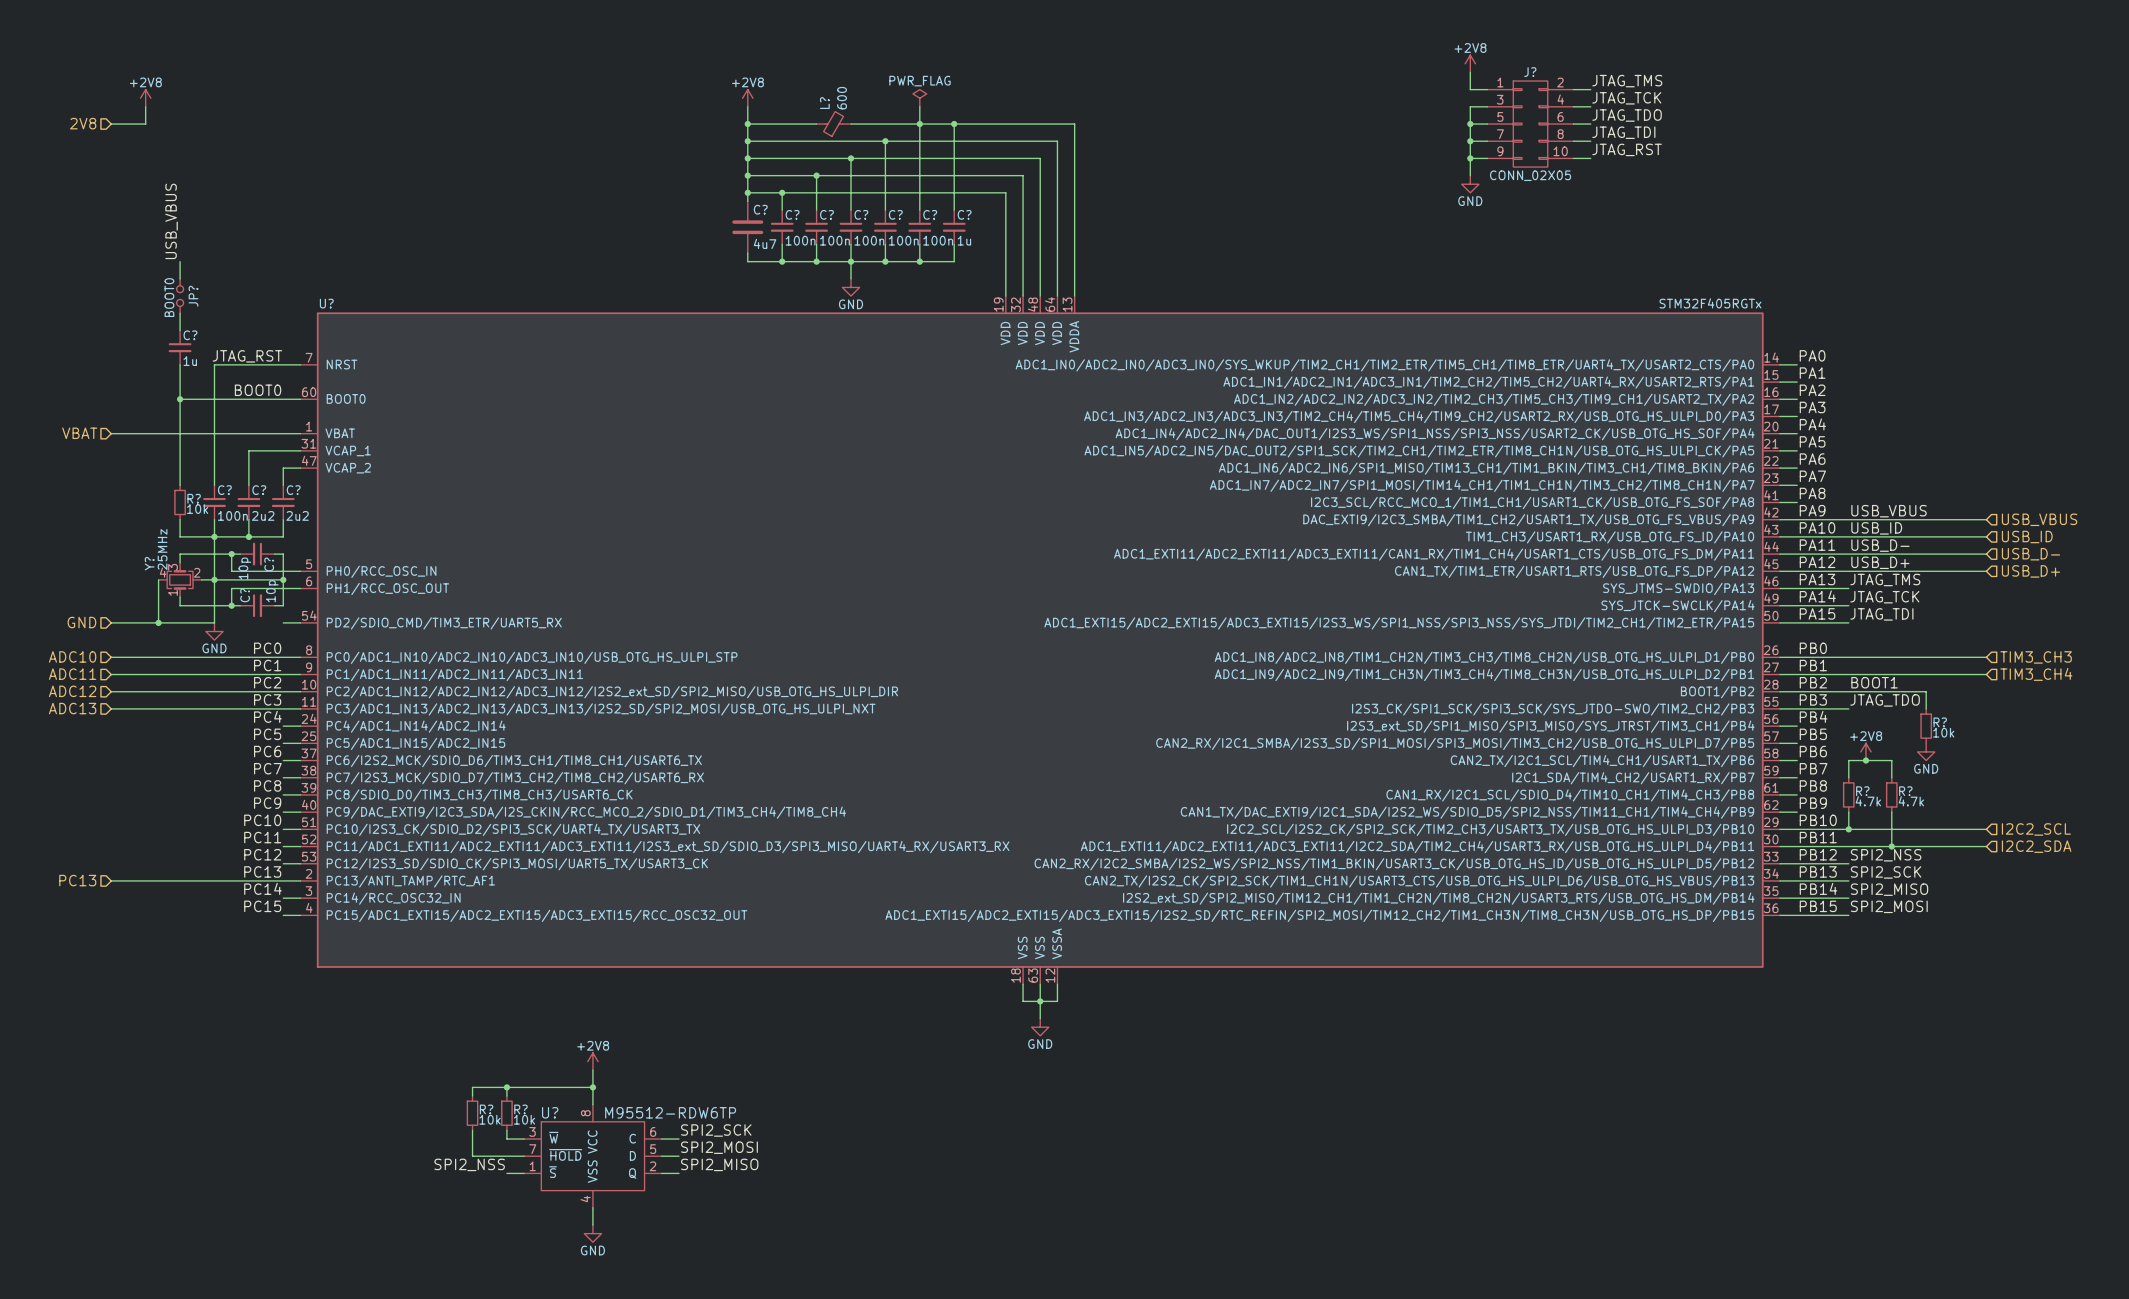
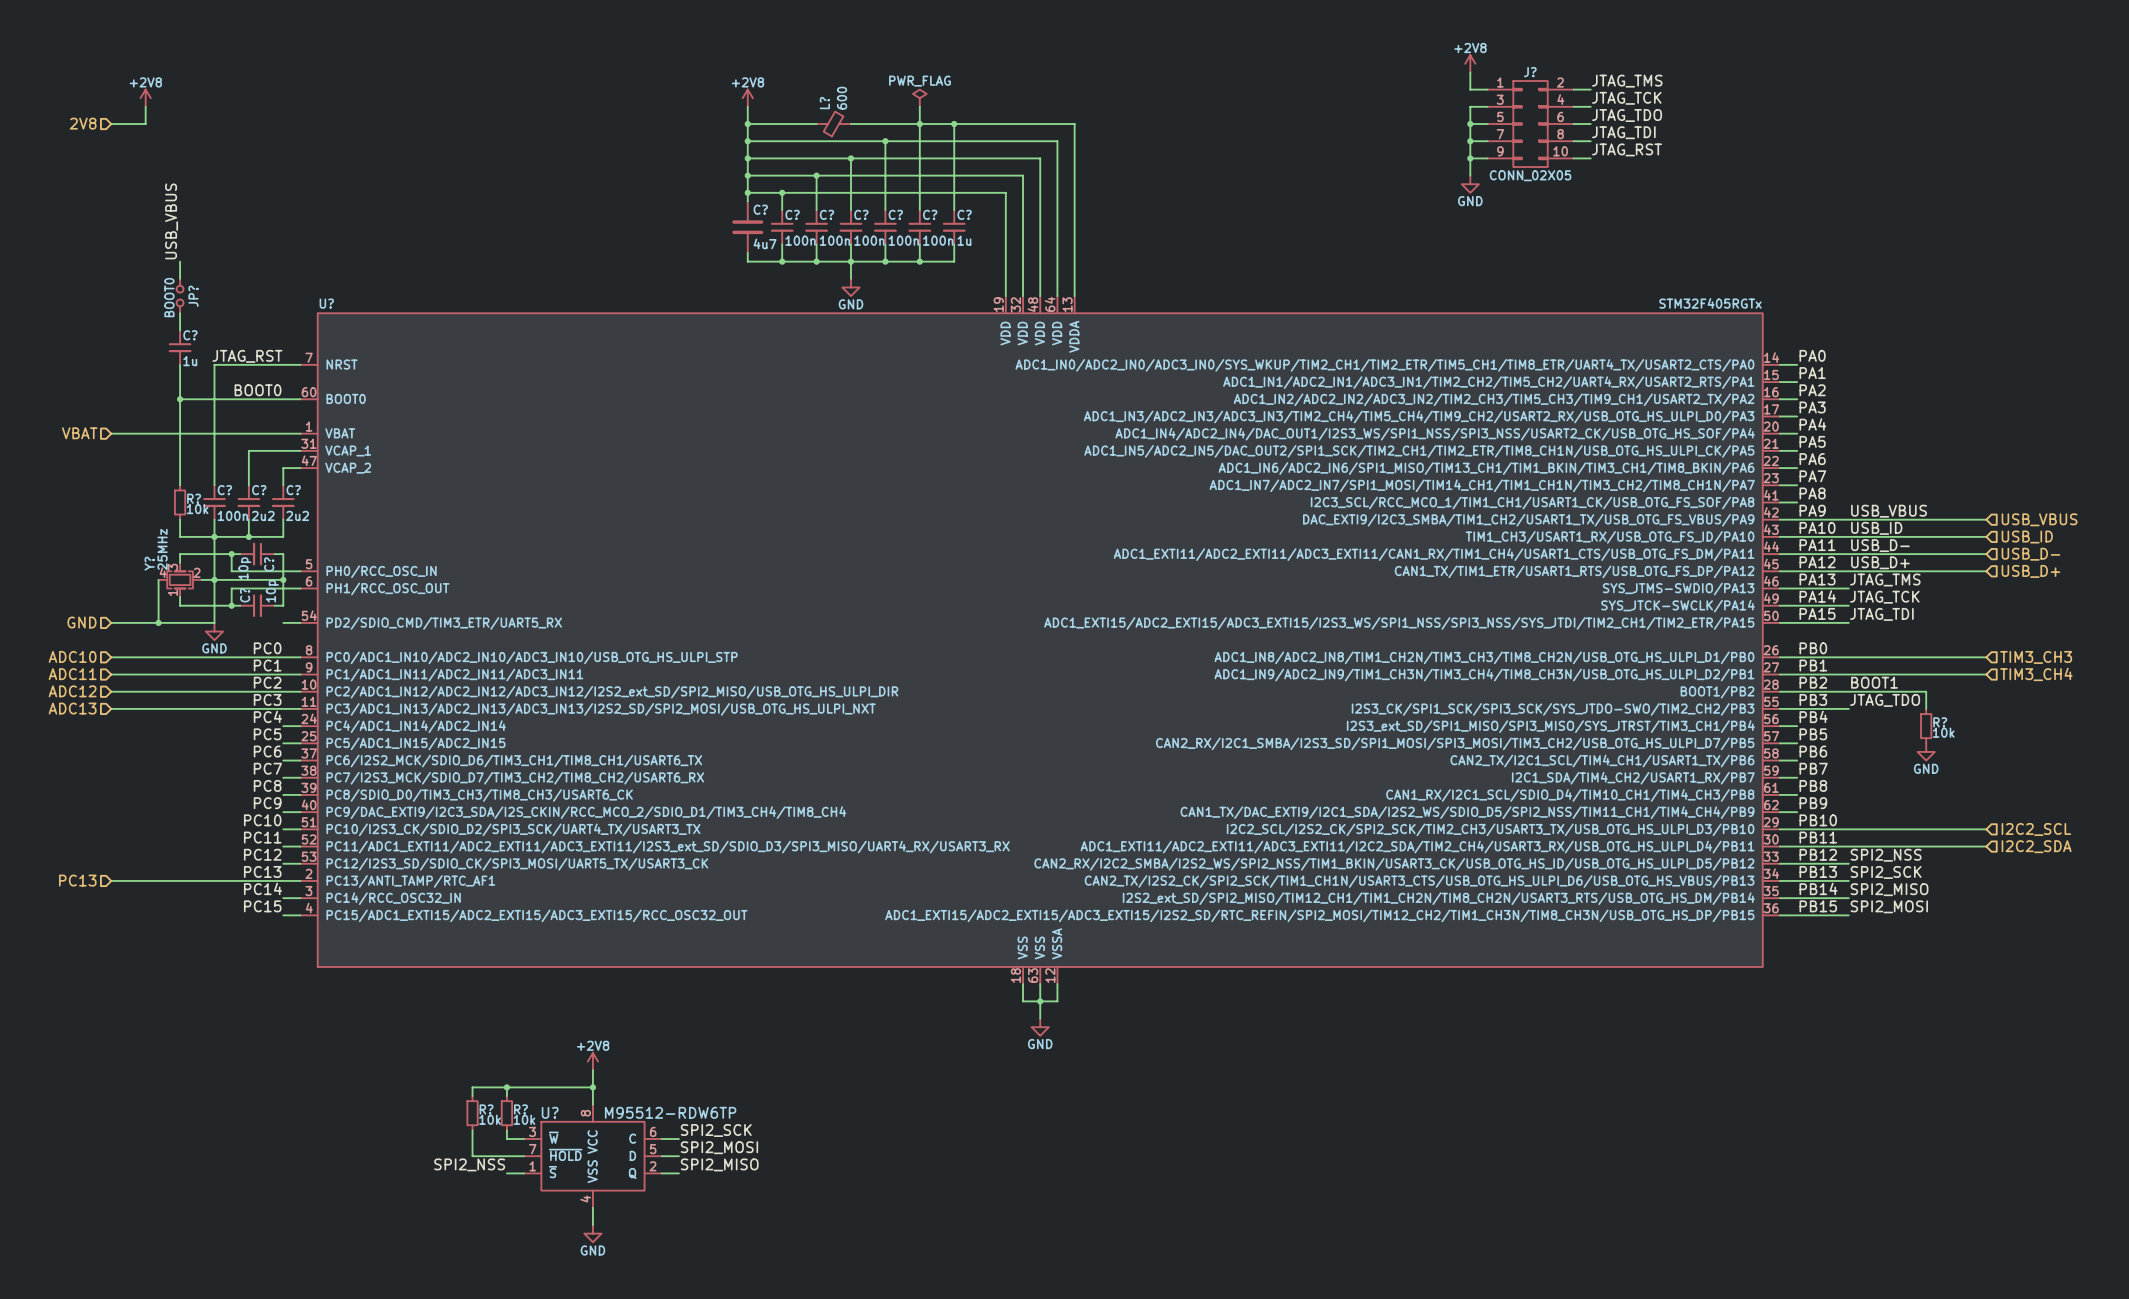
power symbol: +2V8 (1865, 751) -> none
junction: (1865, 760) -> none
wire: (1848, 777) (1848, 760) (1891, 760) (1891, 777) -> none
R?: 4.7k (1848, 794) -> none
R?: 4.7k (1891, 794) -> none
wire: (1848, 812) (1848, 829) -> none
wire: (1891, 812) (1891, 846) -> none
junction: (1848, 829) -> none
junction: (1891, 846) -> none

